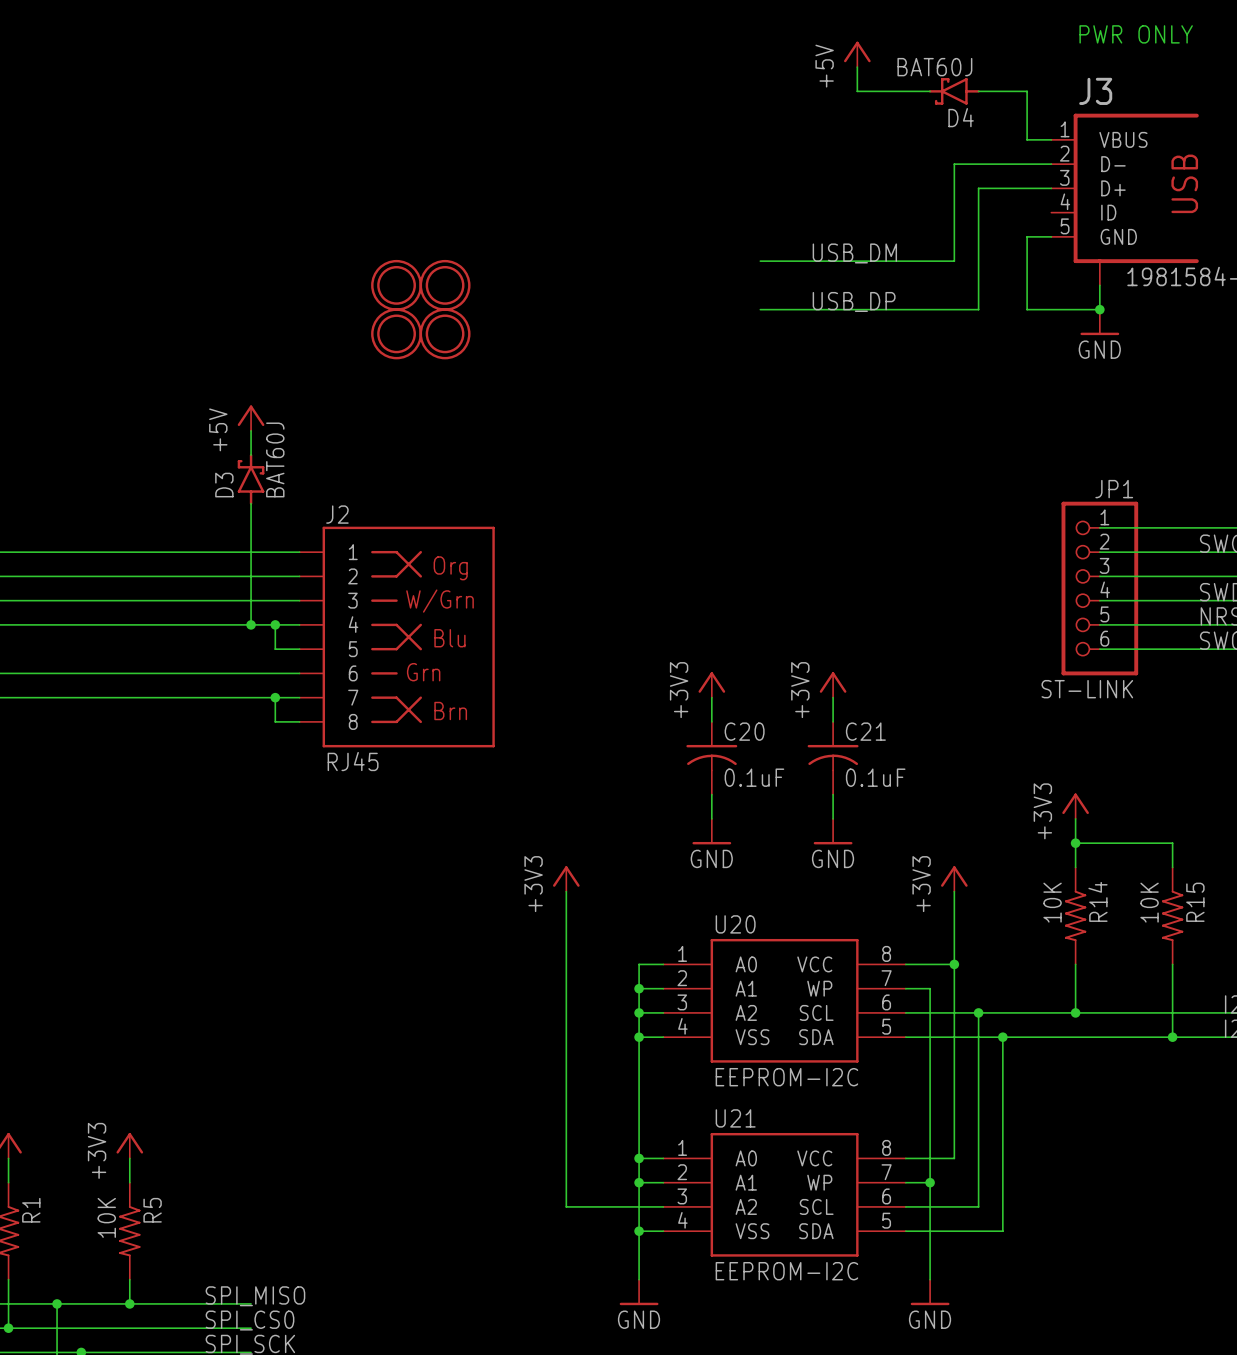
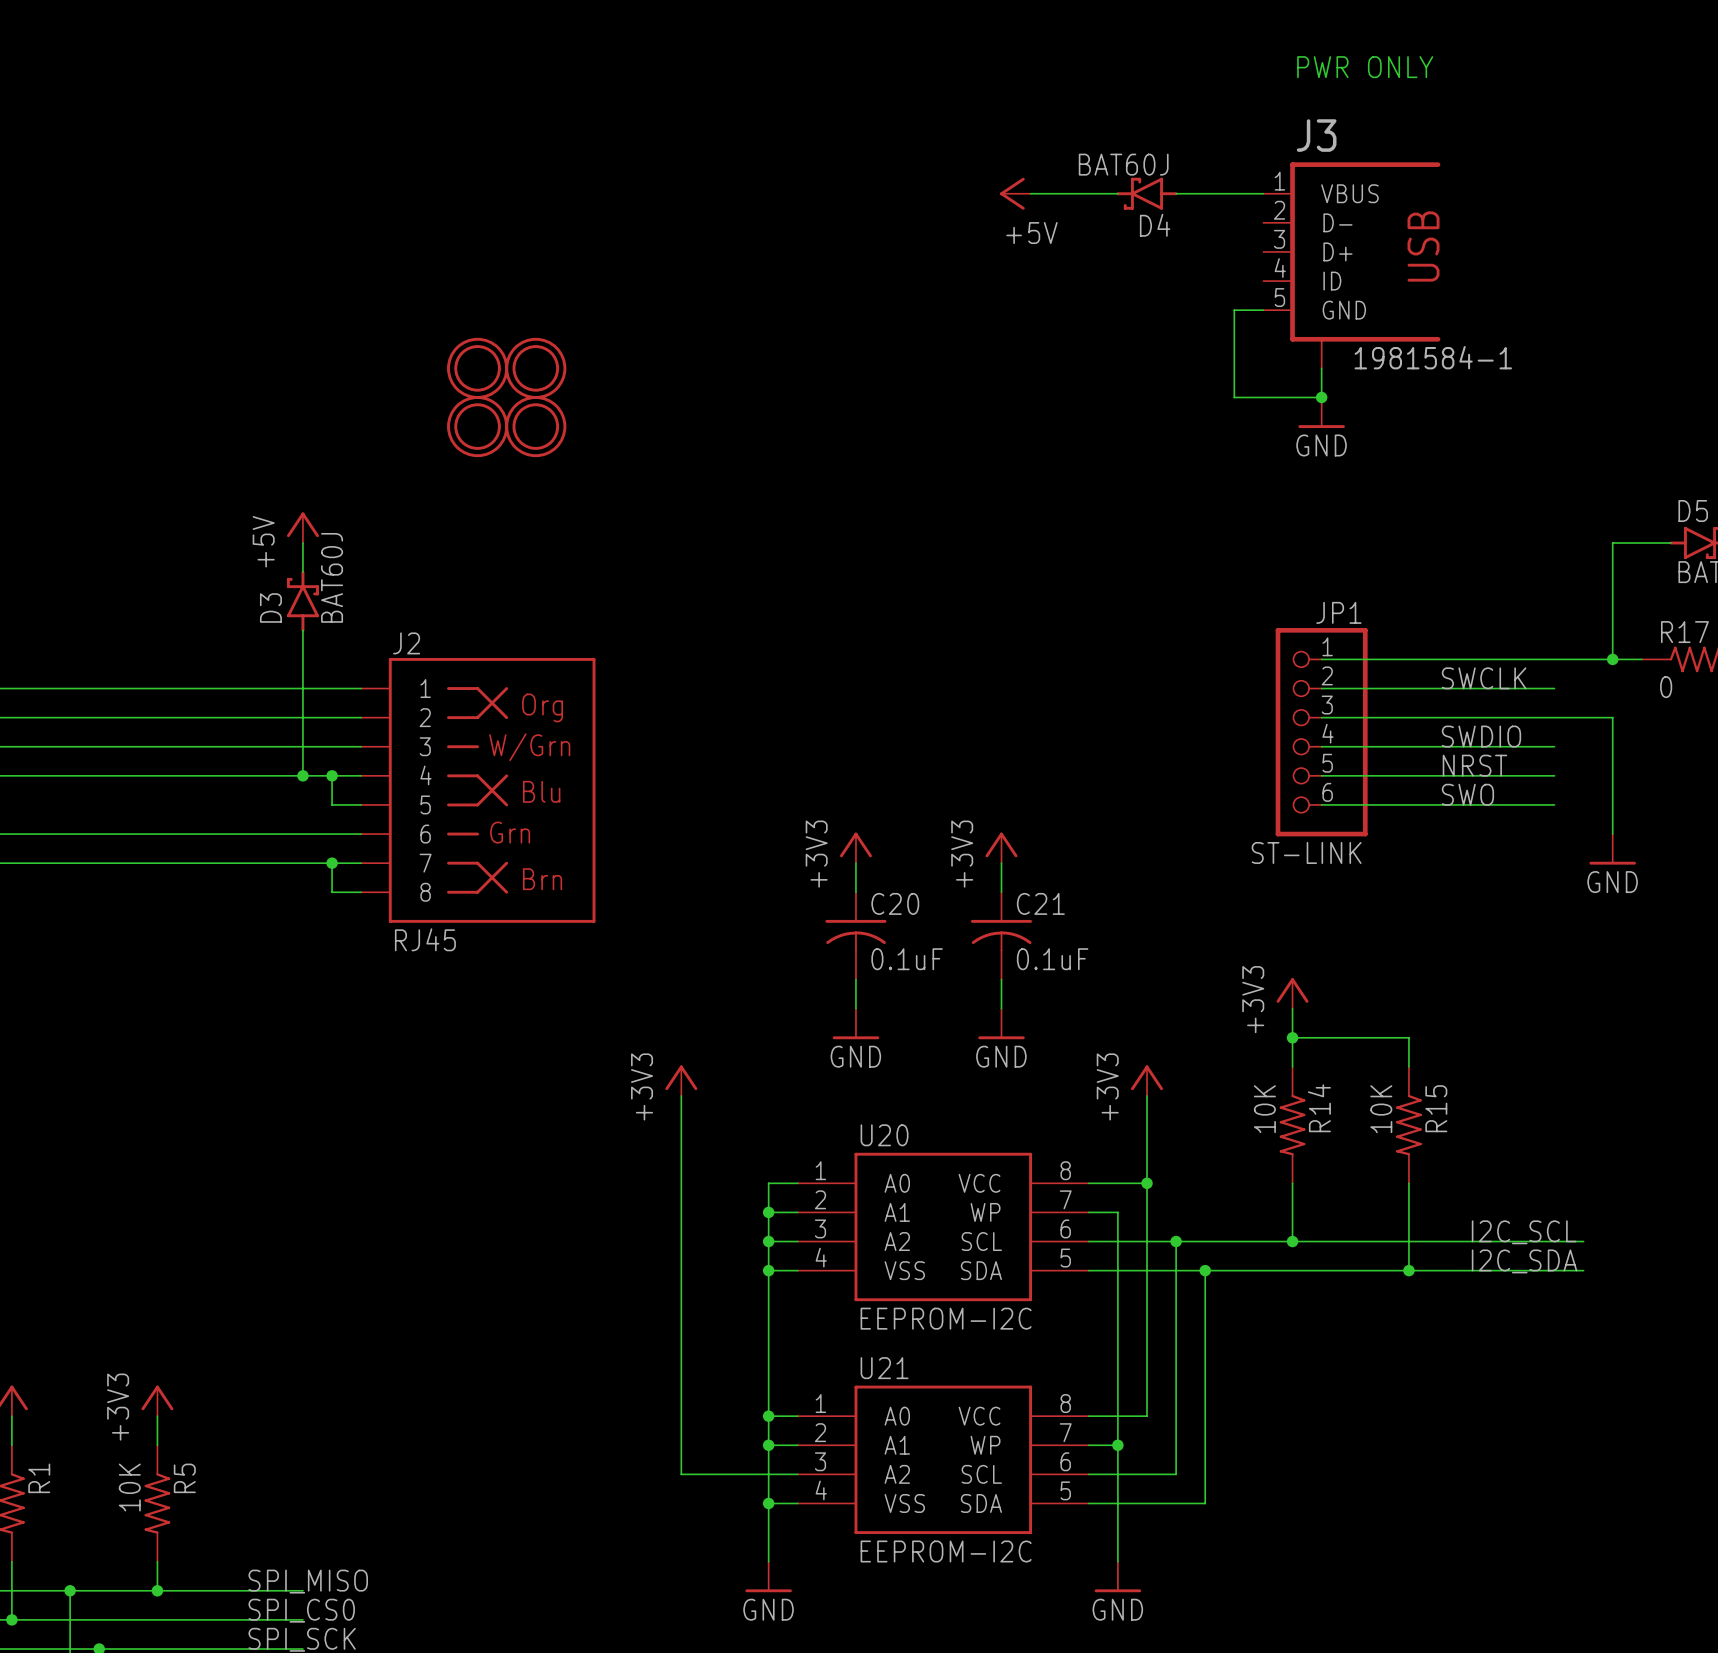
power symbol rotation: 0° (857, 51) -> 90° counterclockwise (1012, 193)
power symbol position: +5V (857, 54) -> +5V (1015, 193)
wire: (857, 67) (857, 91) (930, 91) -> none
D4 position: (954, 91) -> (1147, 193)
wire: (978, 91) (1027, 91) (1027, 139) -> (1176, 193) (1234, 193)
wire: none -> (1030, 193) (1117, 193)
wire: (1051, 164) (954, 164) (954, 261) (760, 261) -> none
wire: (1051, 188) (978, 188) (978, 309) (760, 309) -> none
label: USB_DM (854, 253) -> none
label: USB_DP (854, 301) -> none

